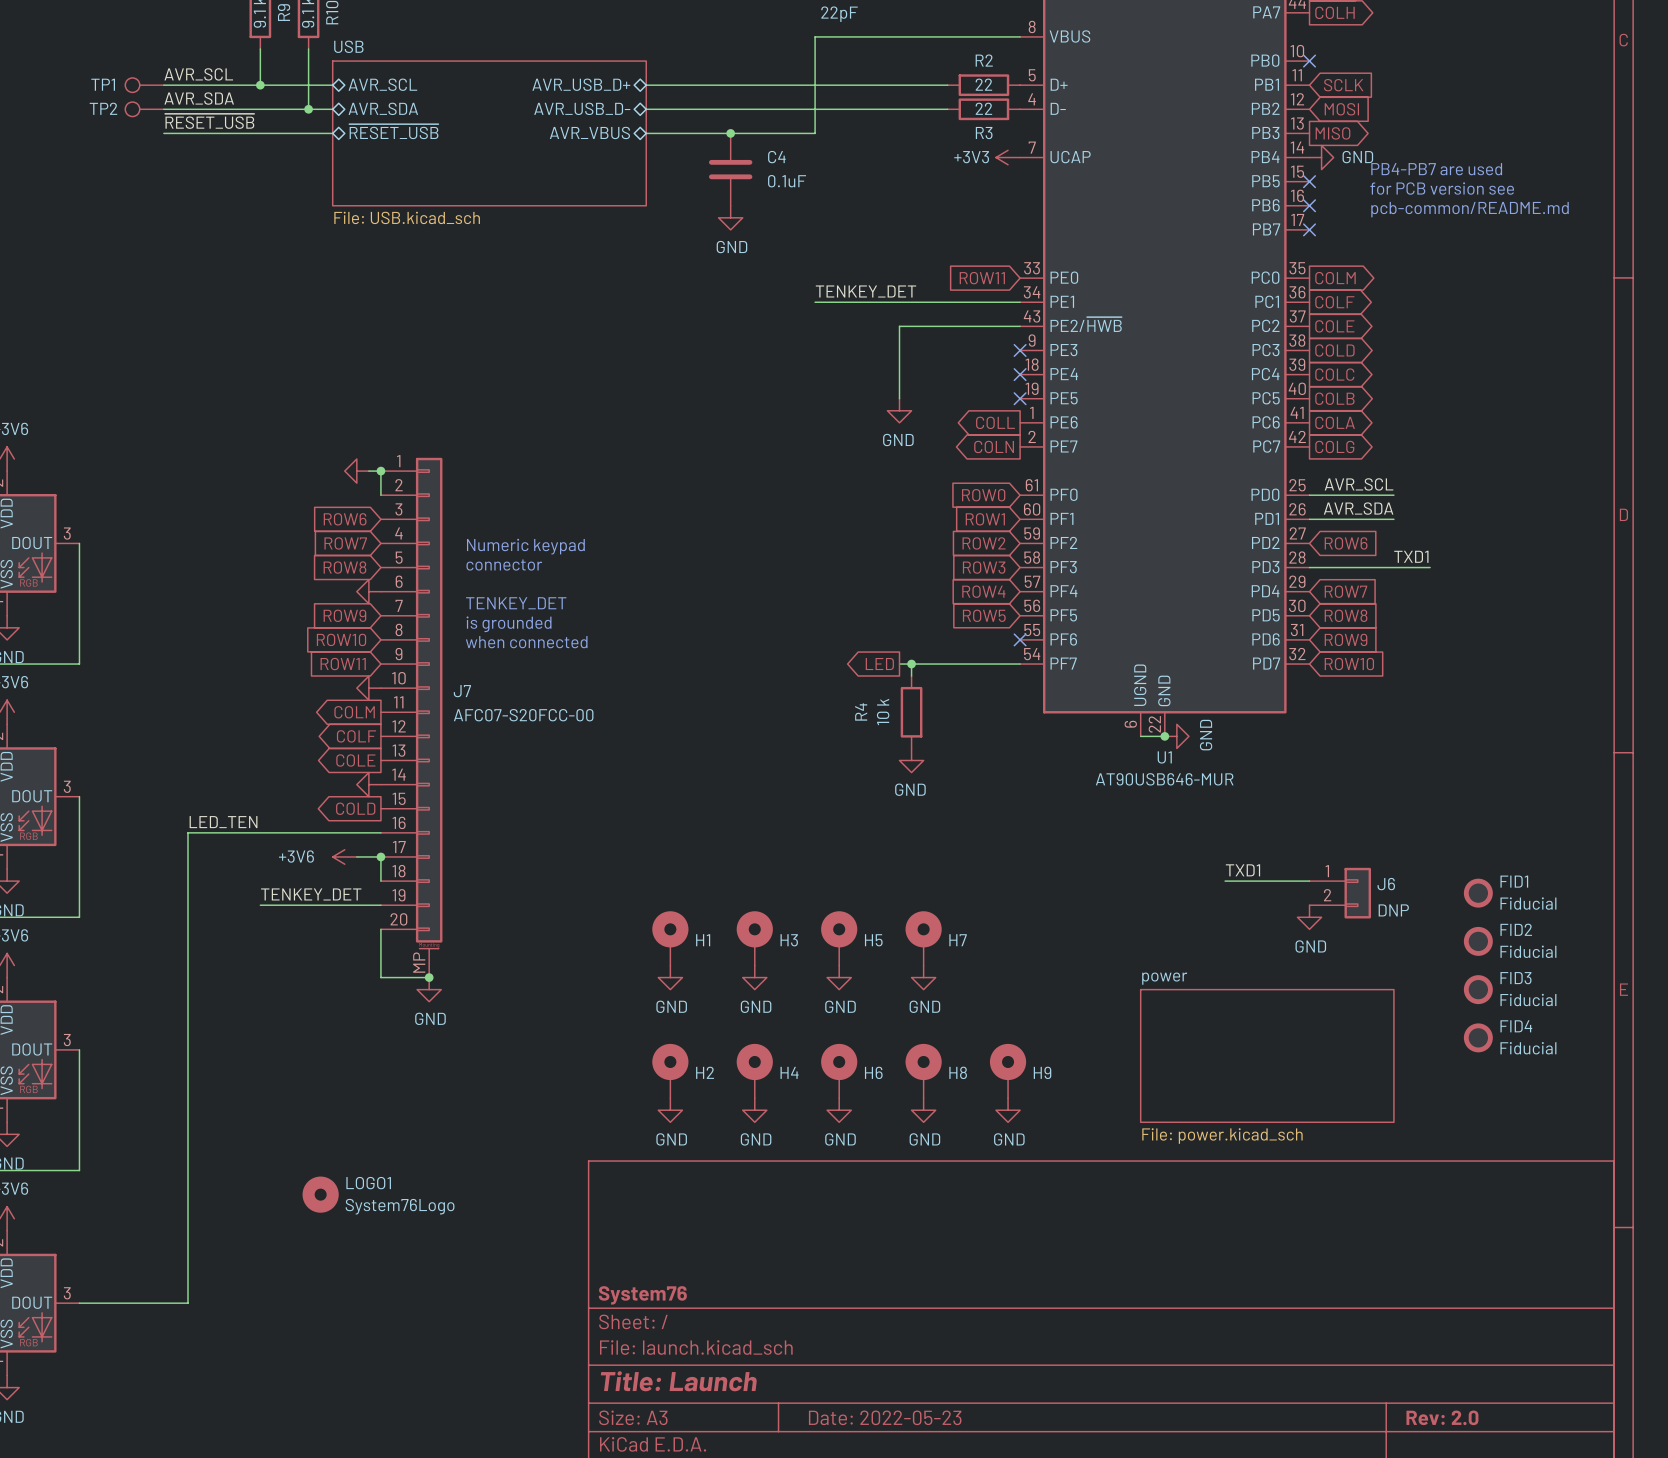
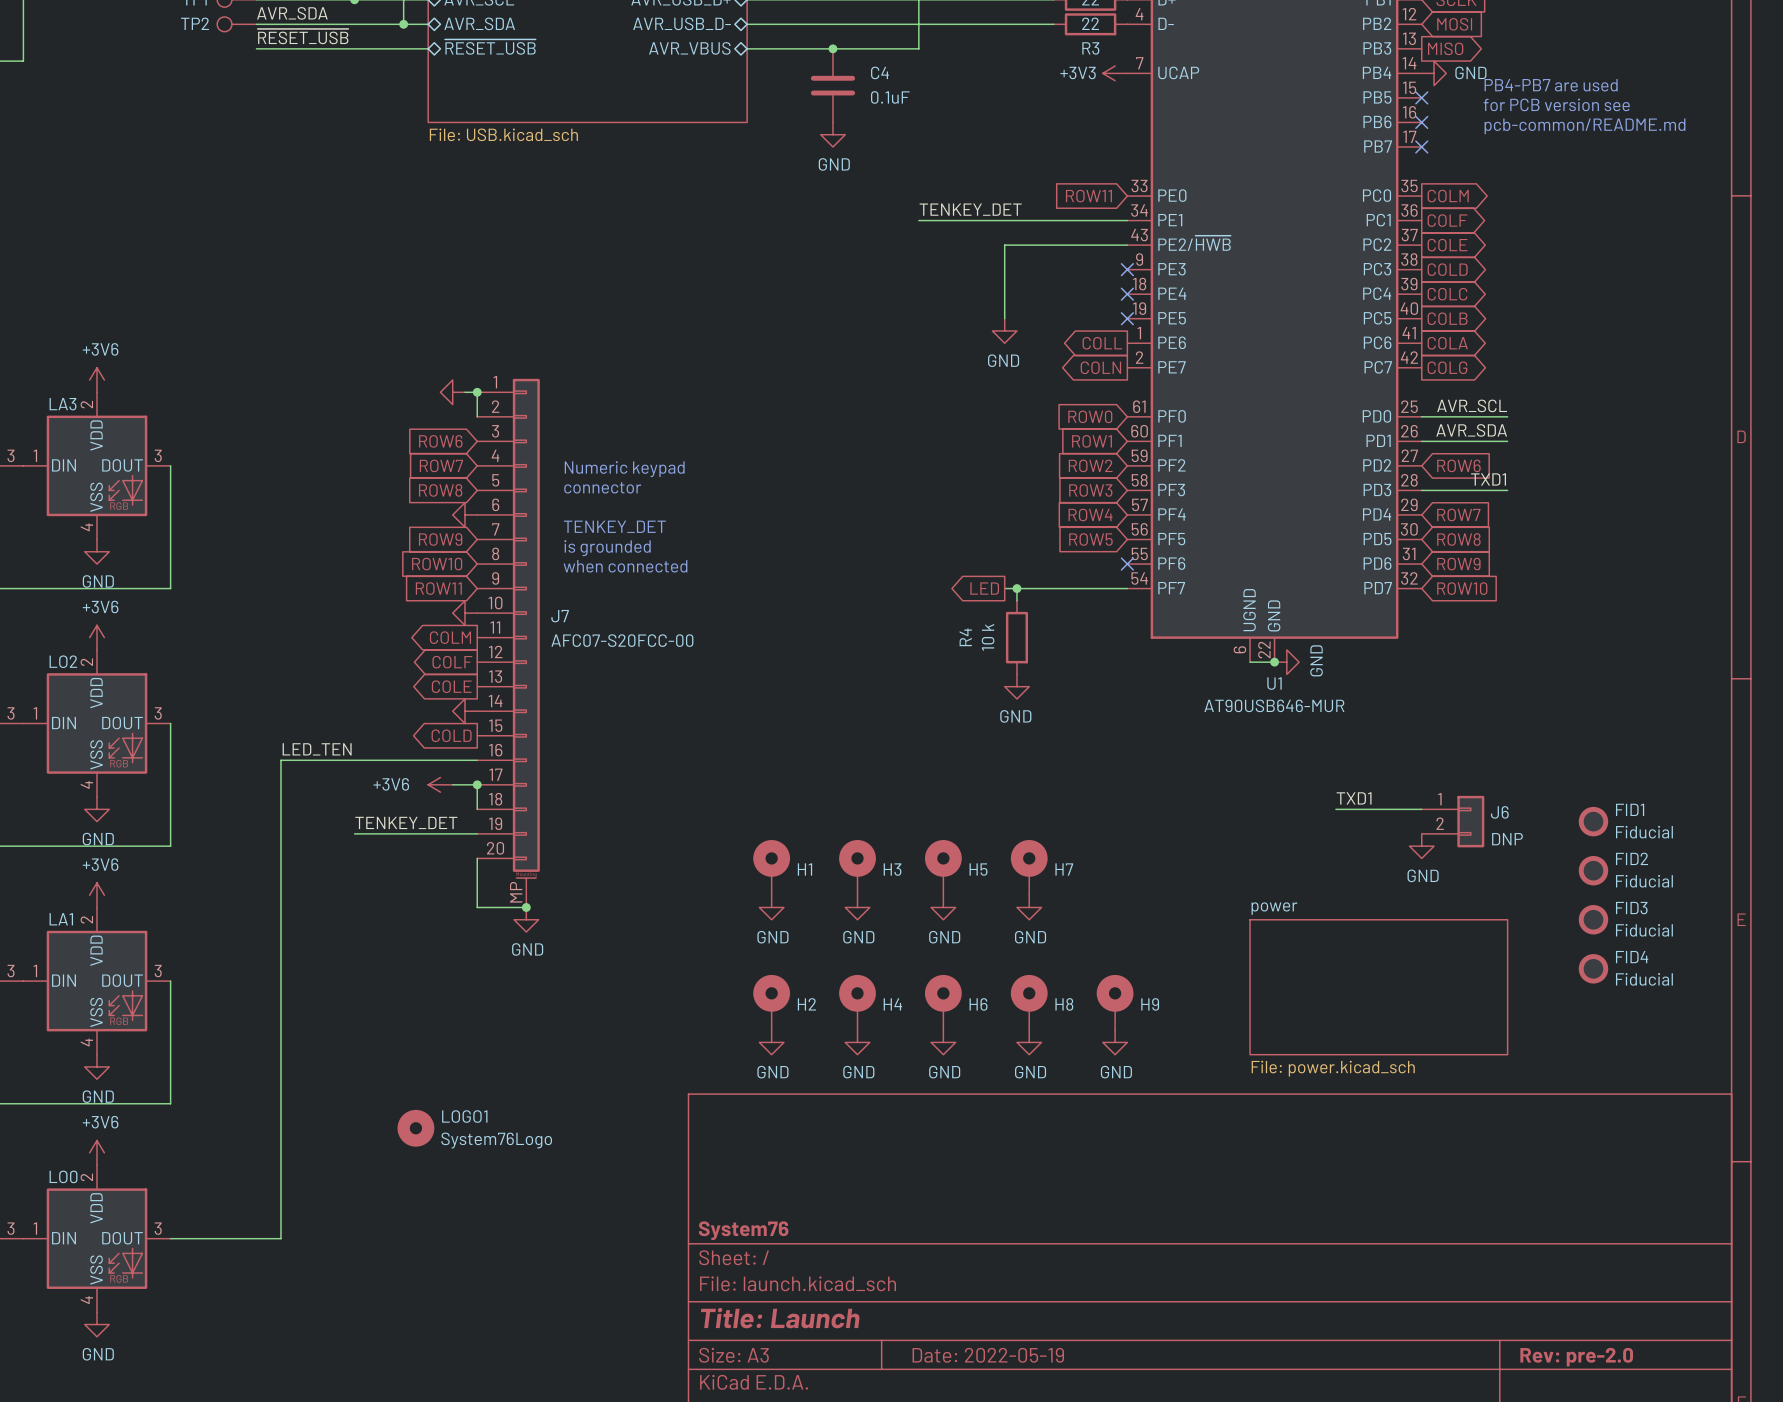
label position: TXD1 (1411, 556) -> TXD1 (1488, 479)
wire: (1393, 567) (1430, 567) -> none
title block: Date: 2022-05-23 (885, 1417) -> Date: 2022-05-19 (988, 1355)
title block: Rev: 2.0 (1442, 1417) -> Rev: pre-2.0 (1576, 1357)

